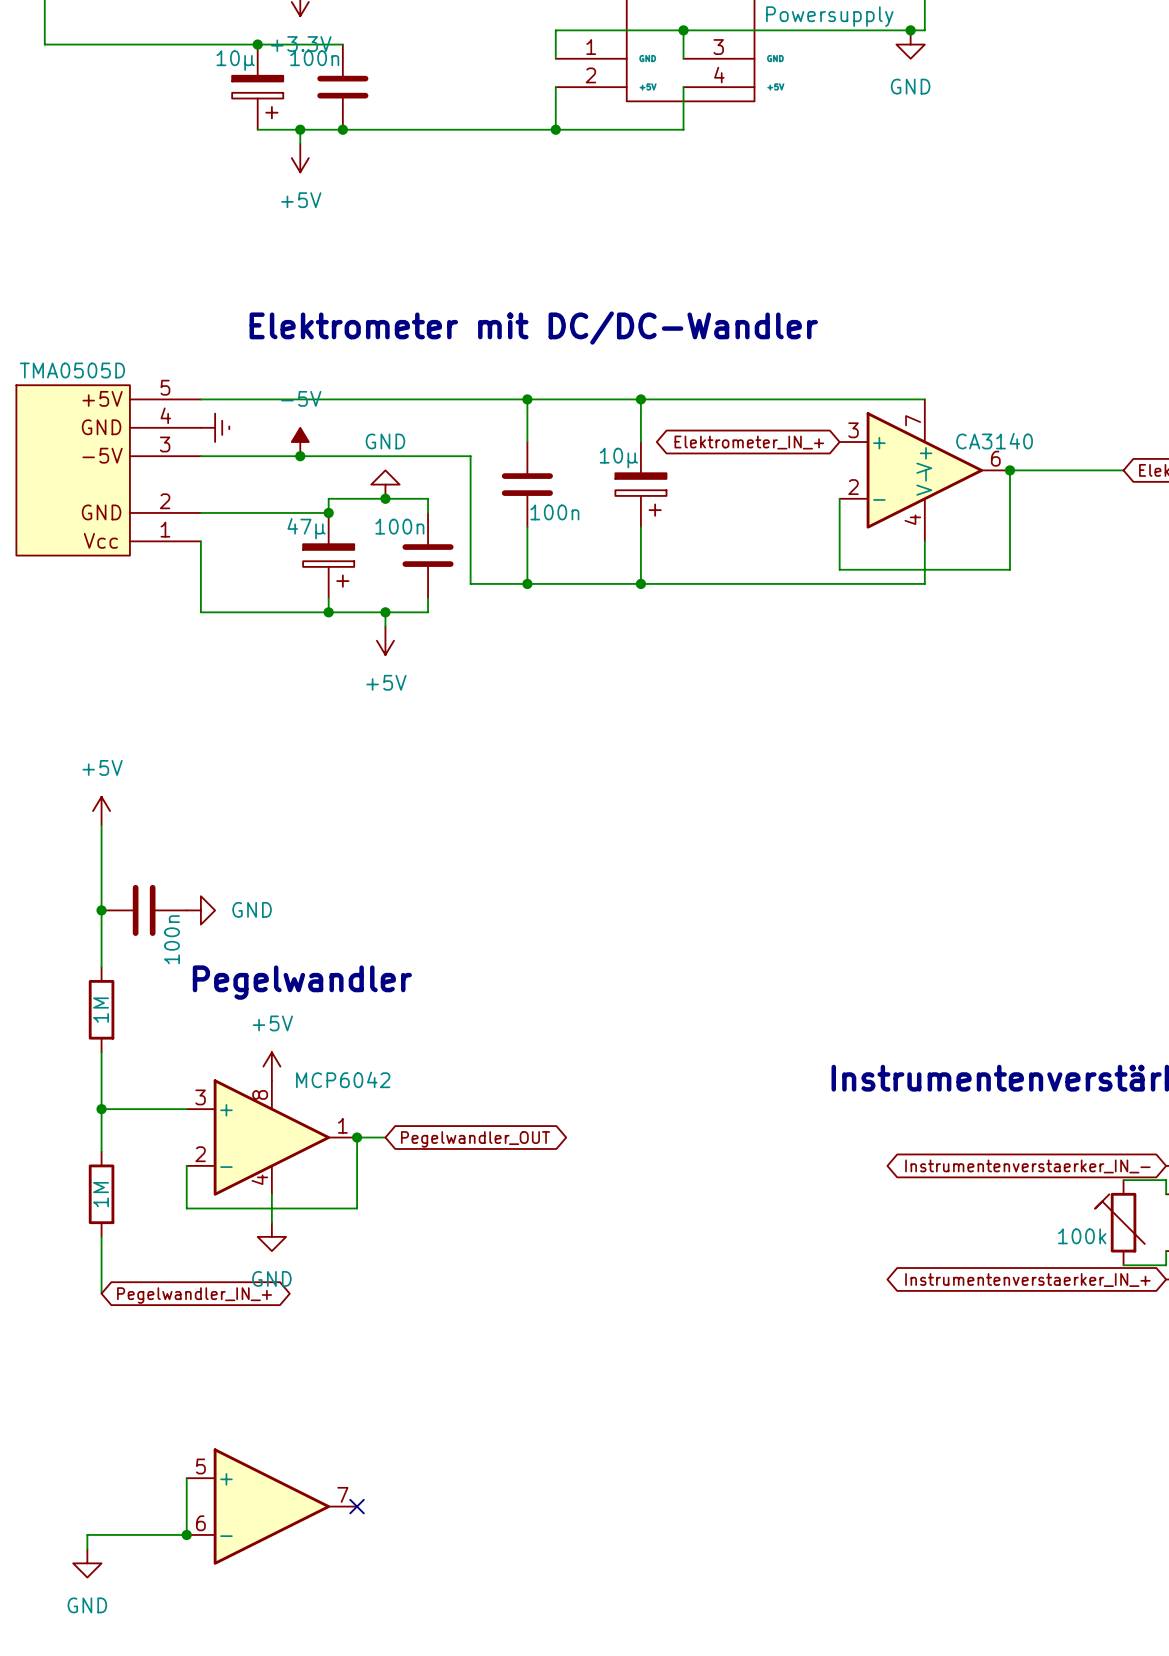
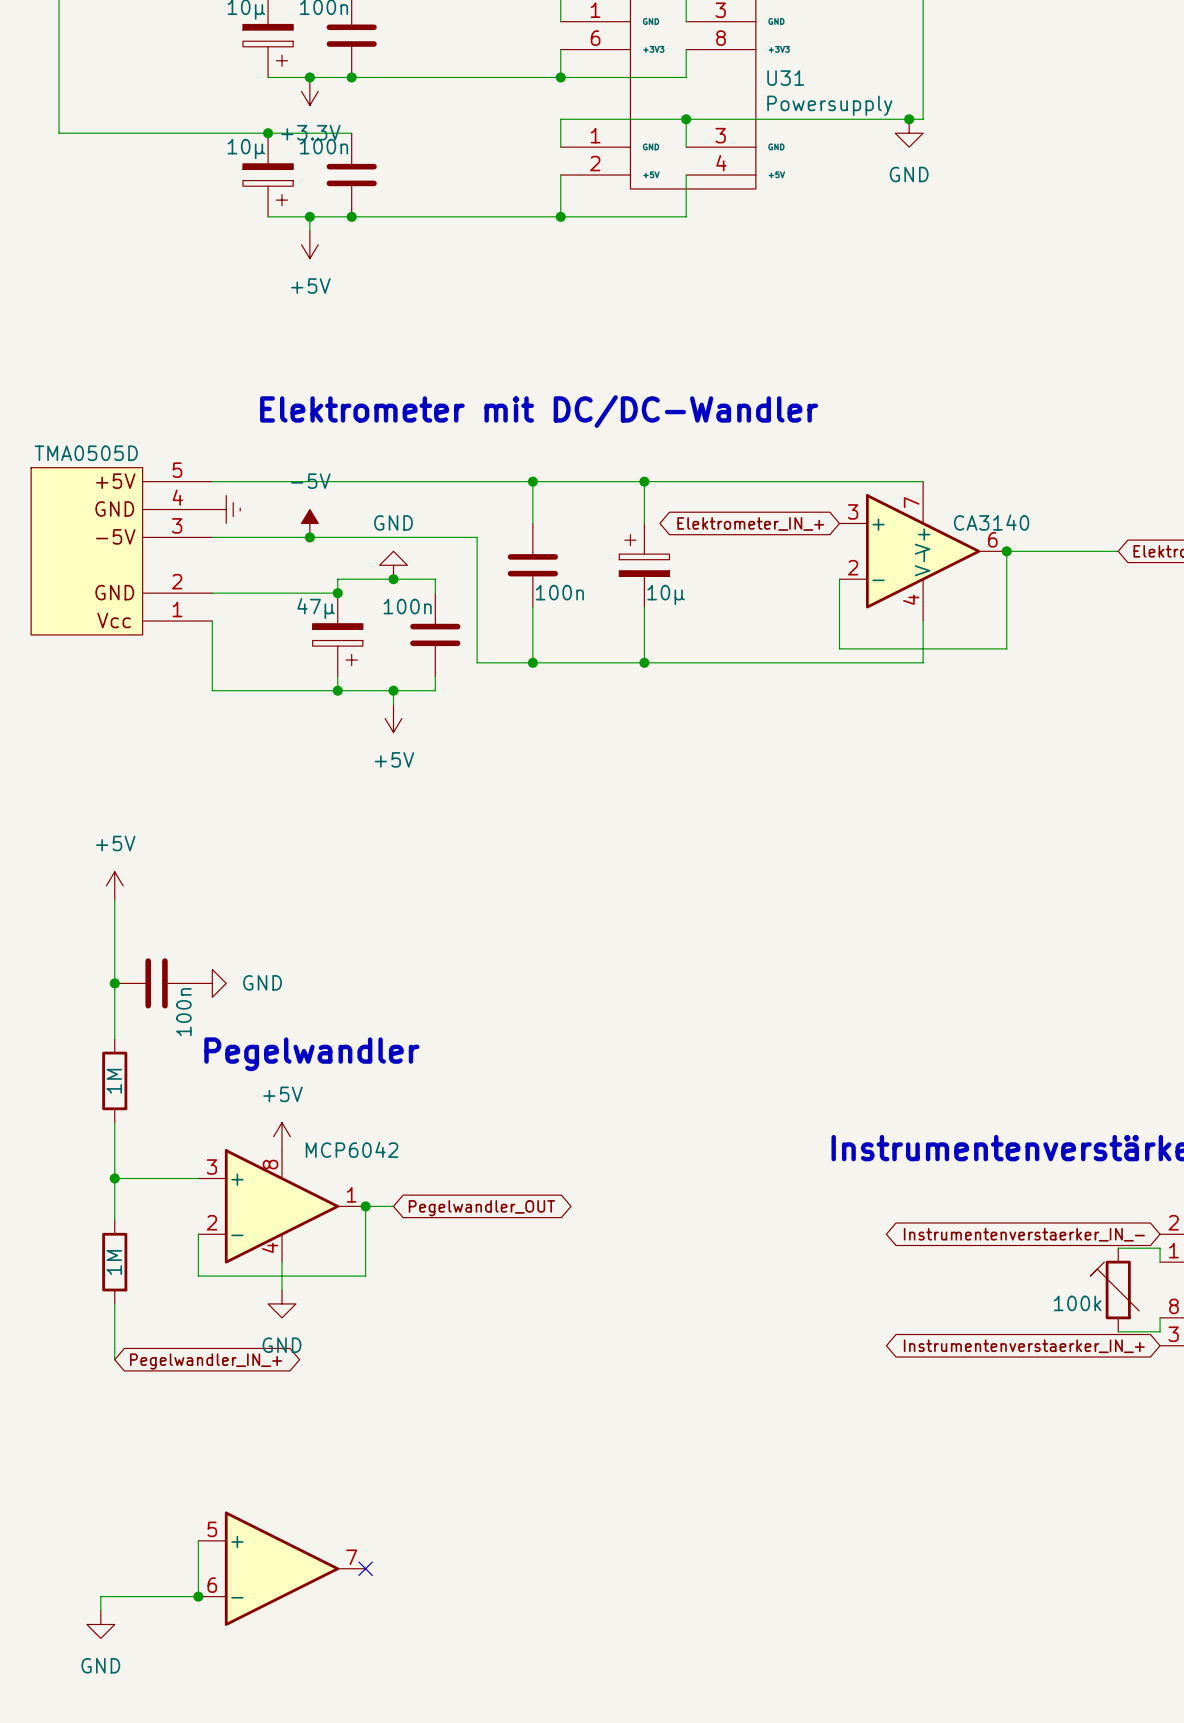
part rotation: 0° (640, 494) -> 180° (644, 555)

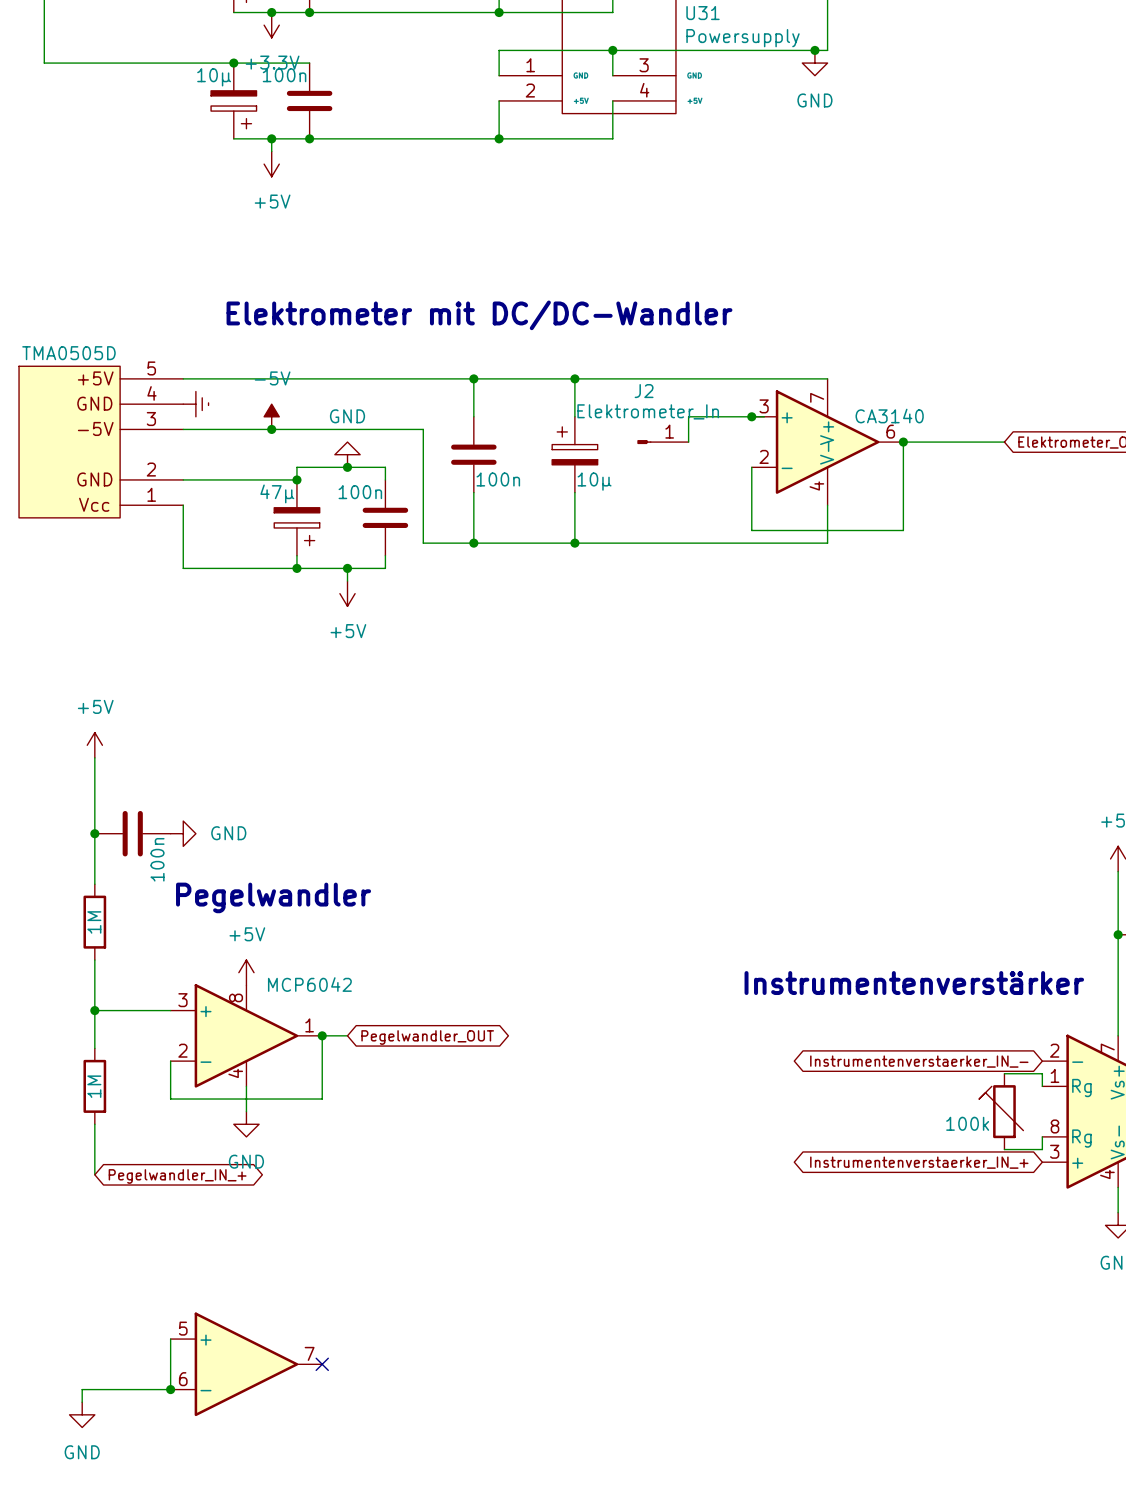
global label: Elektrometer_IN_+ (750, 523) -> none
junction: none -> (751, 416)
wire: none -> (764, 416) (688, 416) (688, 442)
J2: none -> Elektrometer_In (662, 442)

